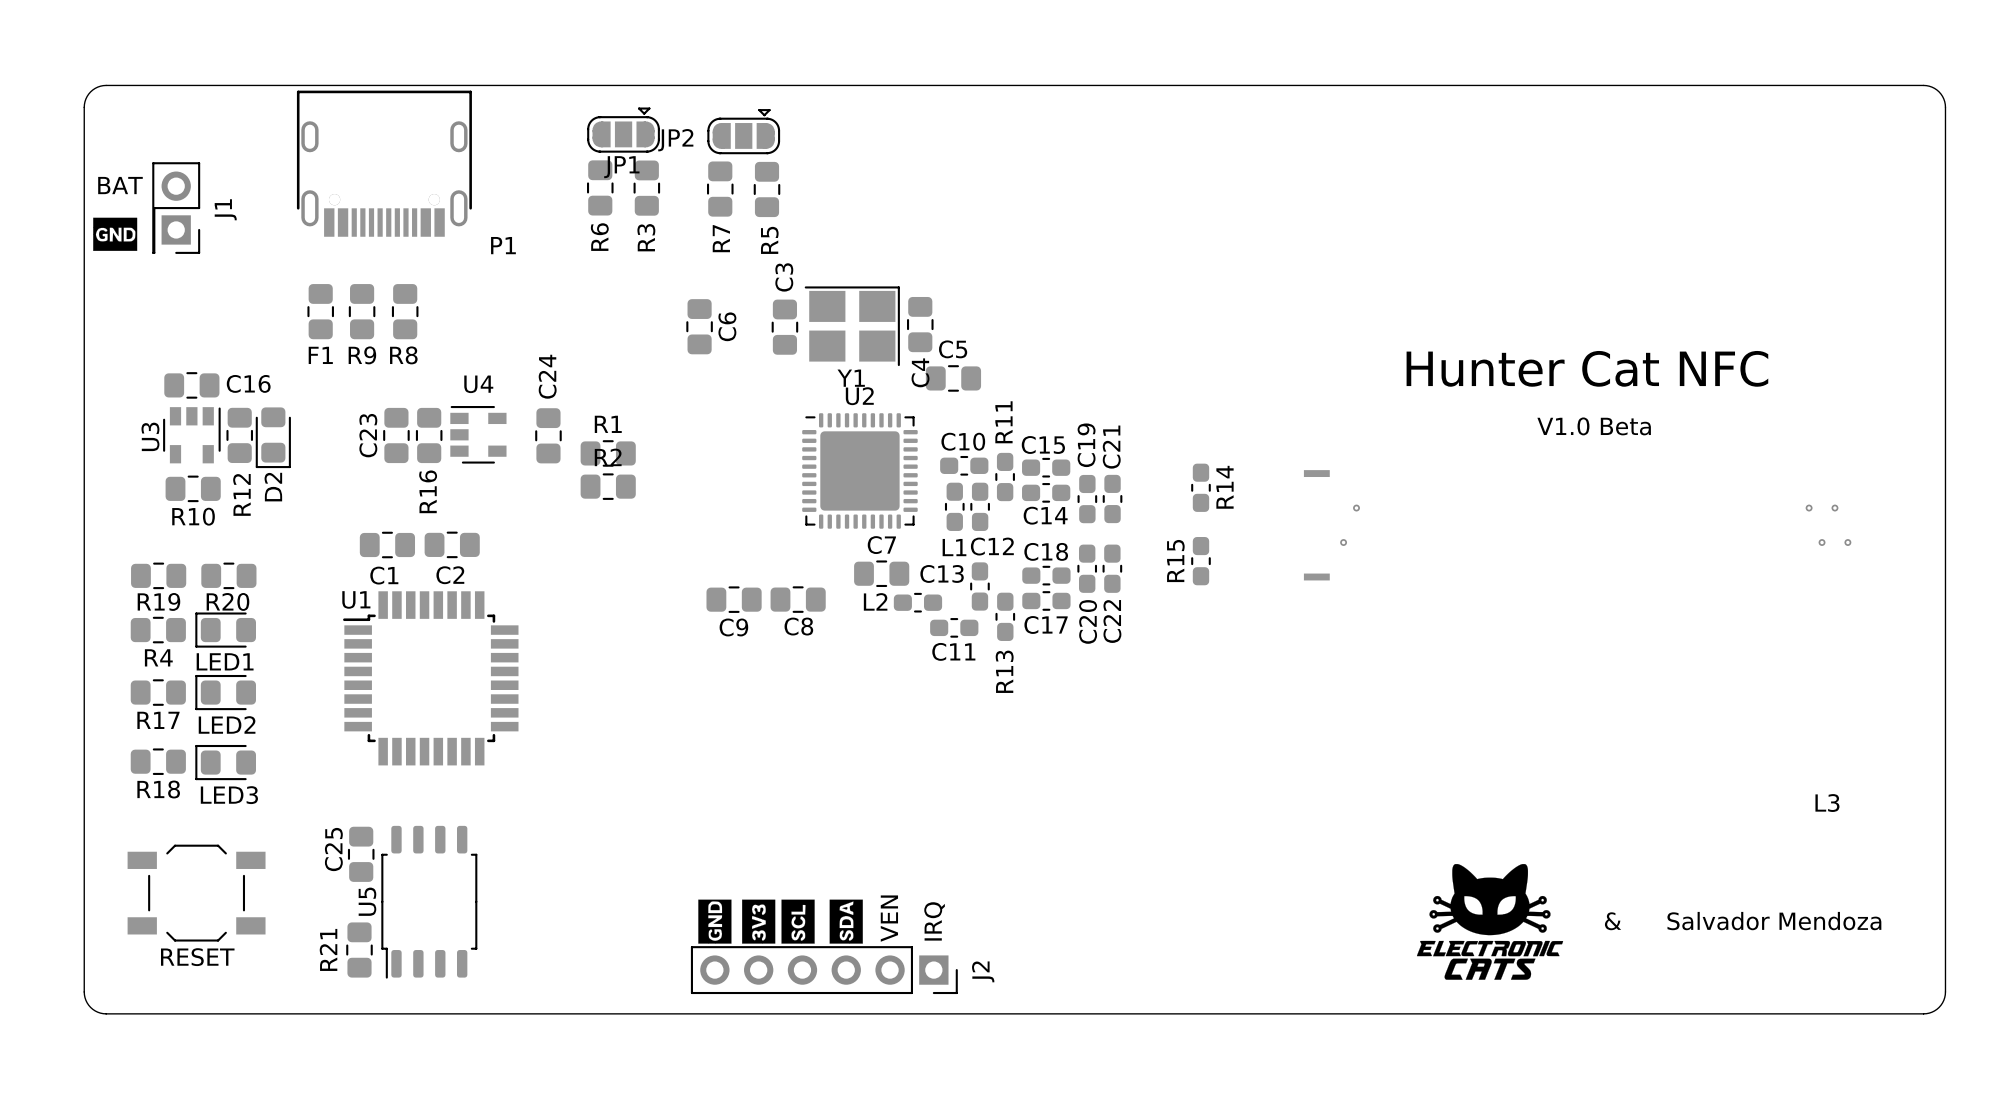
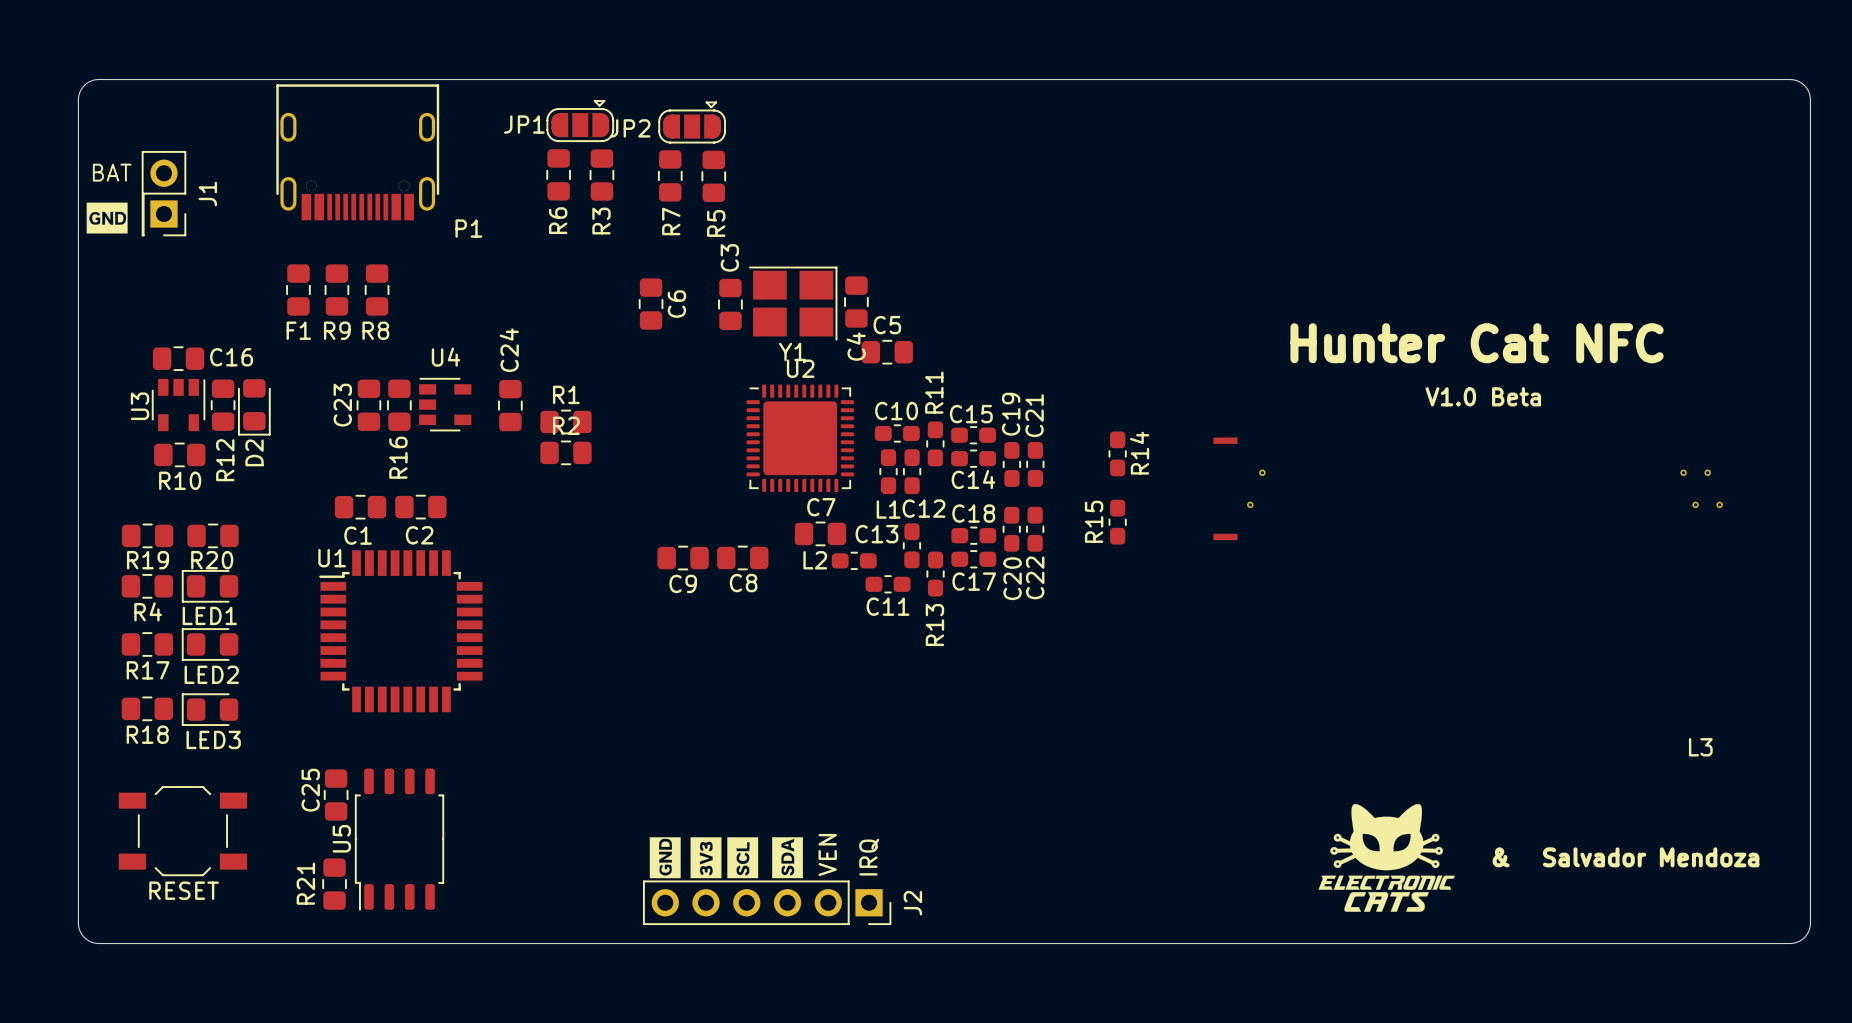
JP1 name position: JP1 (621, 167) -> JP1 (524, 124)

